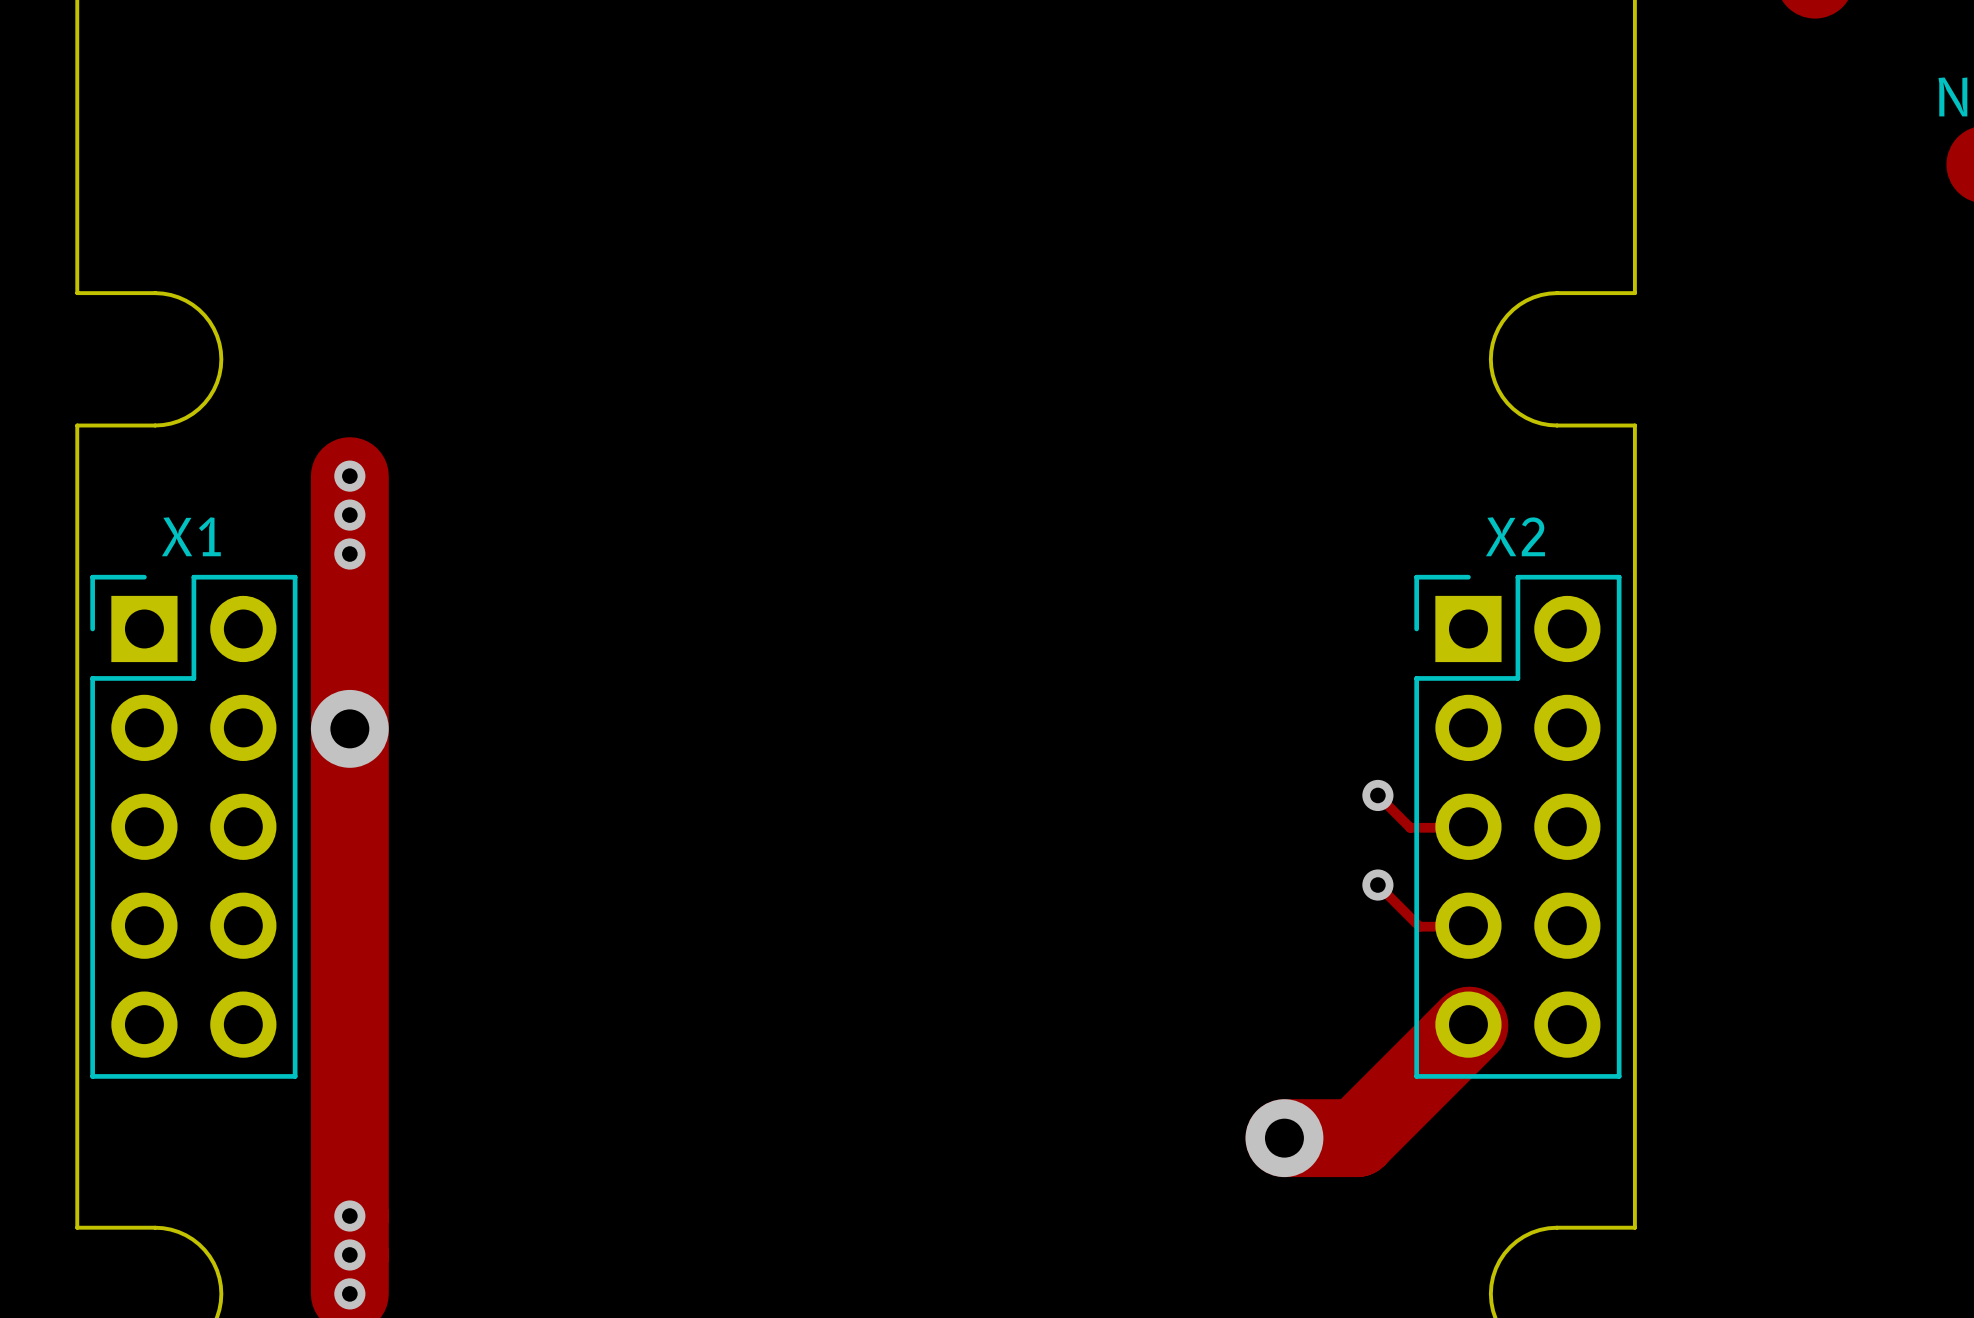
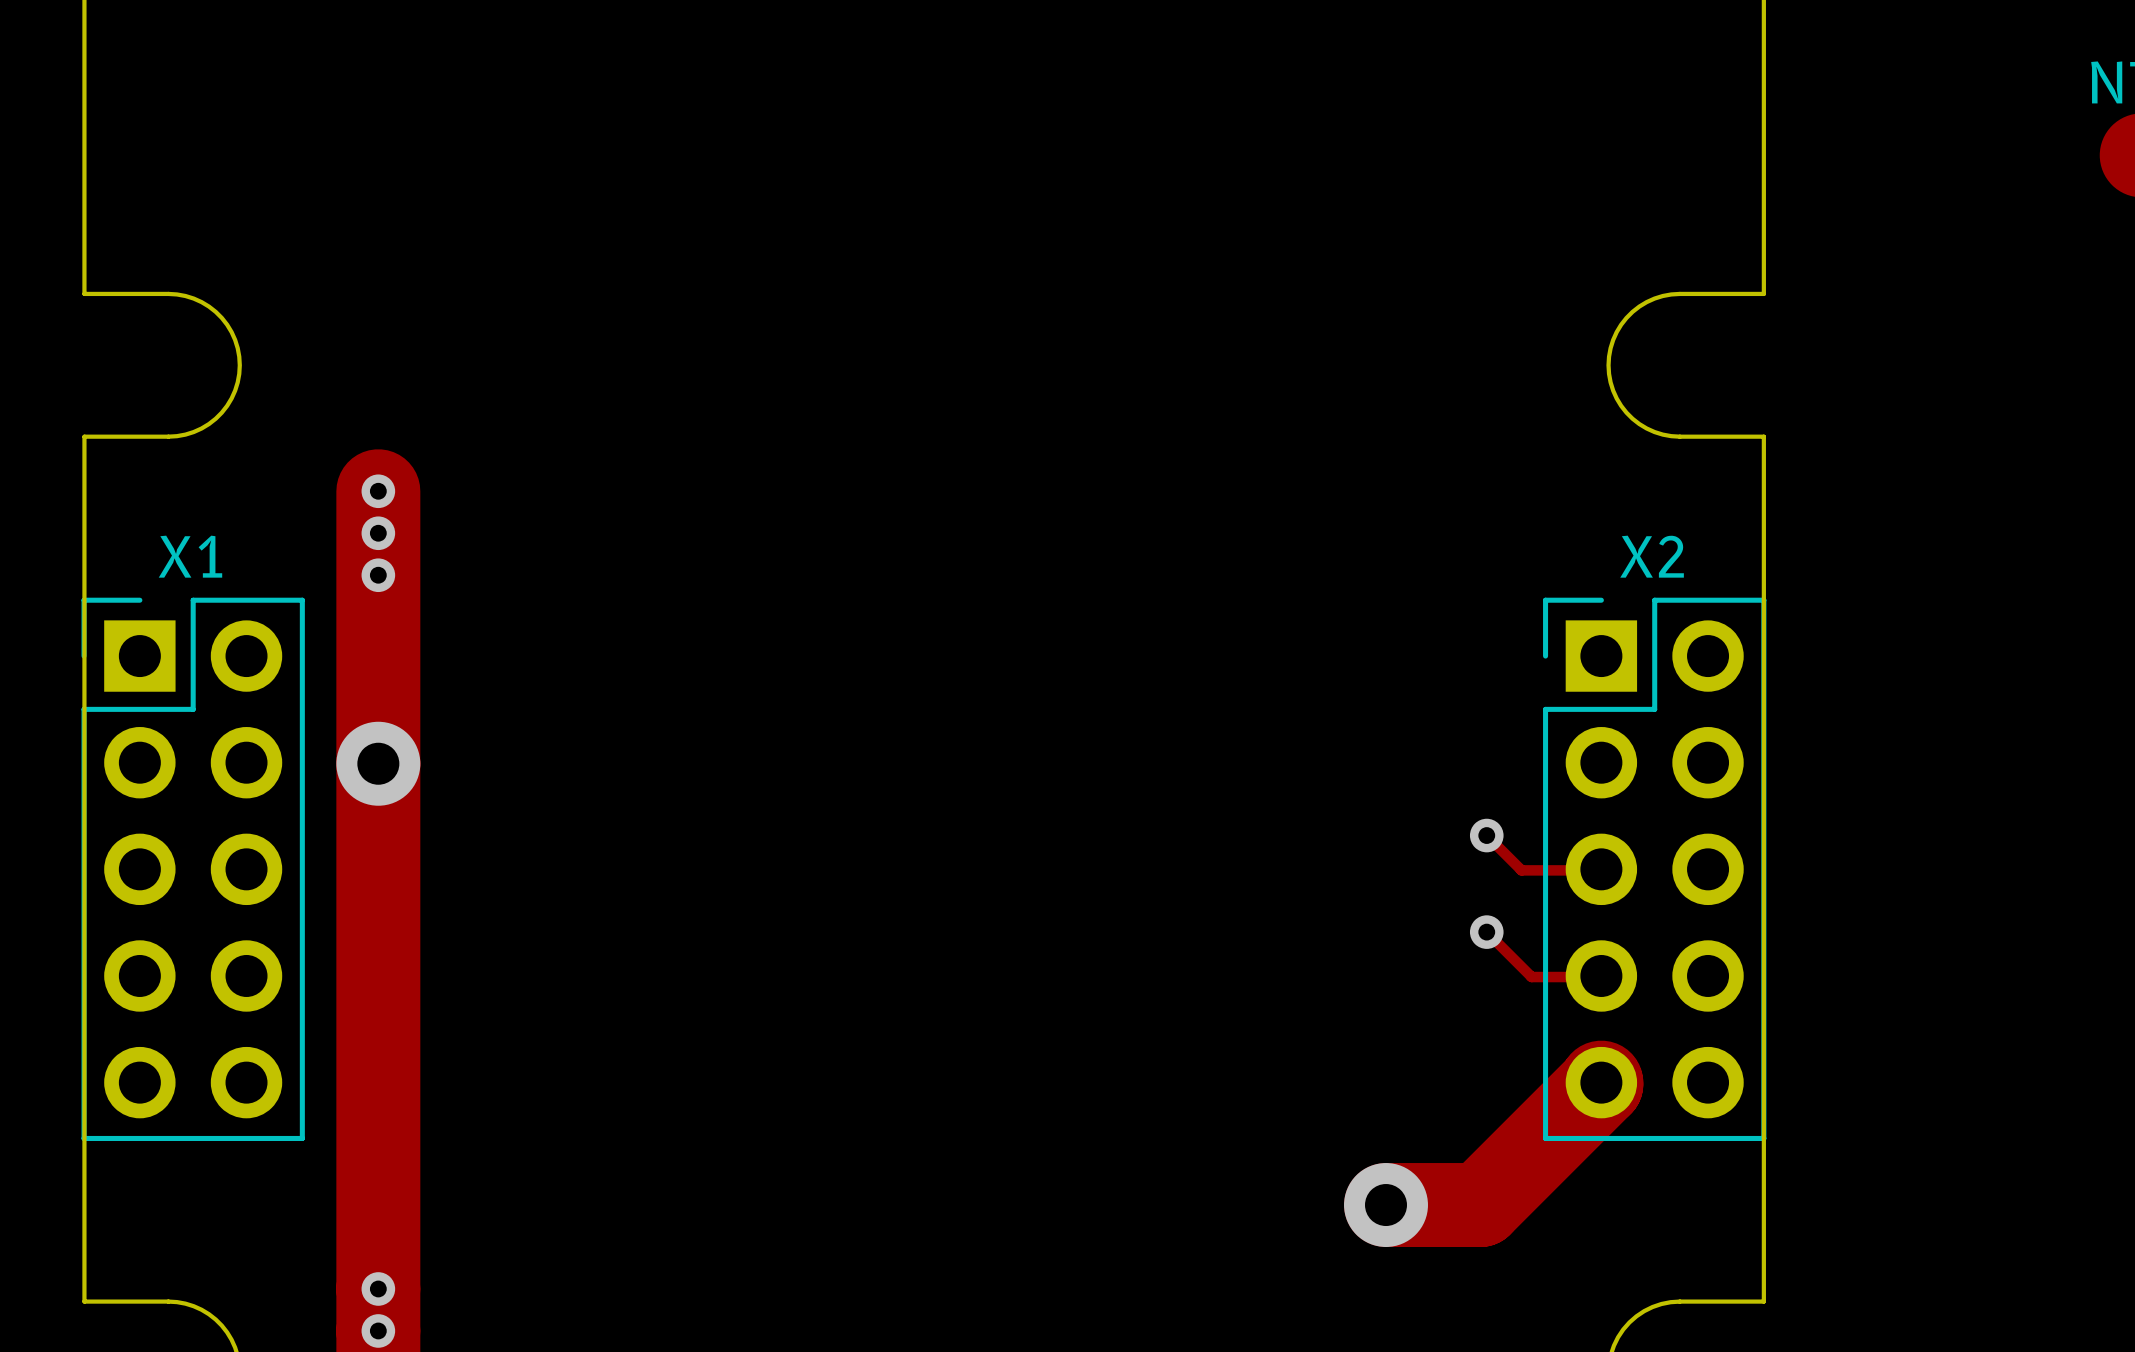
X1 position: (193, 826) -> (193, 869)
X2 position: (1517, 826) -> (1654, 869)
track: (1469, 1025) (1356, 1138) -> (1601, 1082) (1480, 1205) (1464, 1205)

